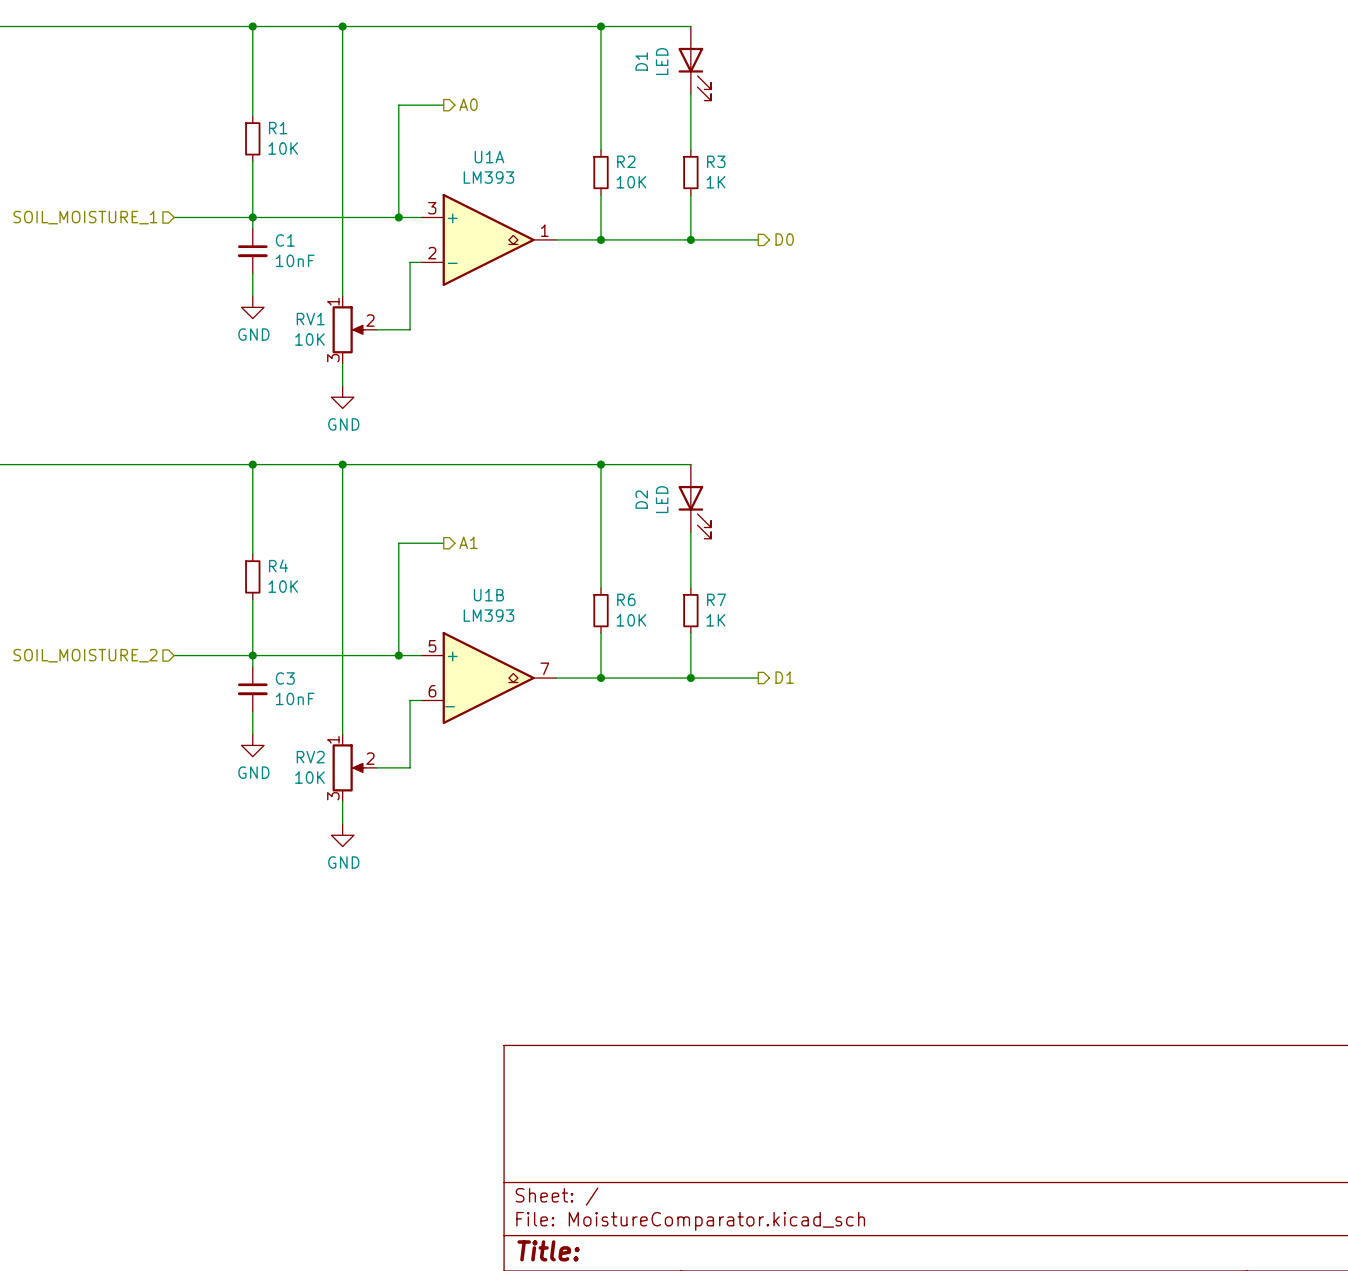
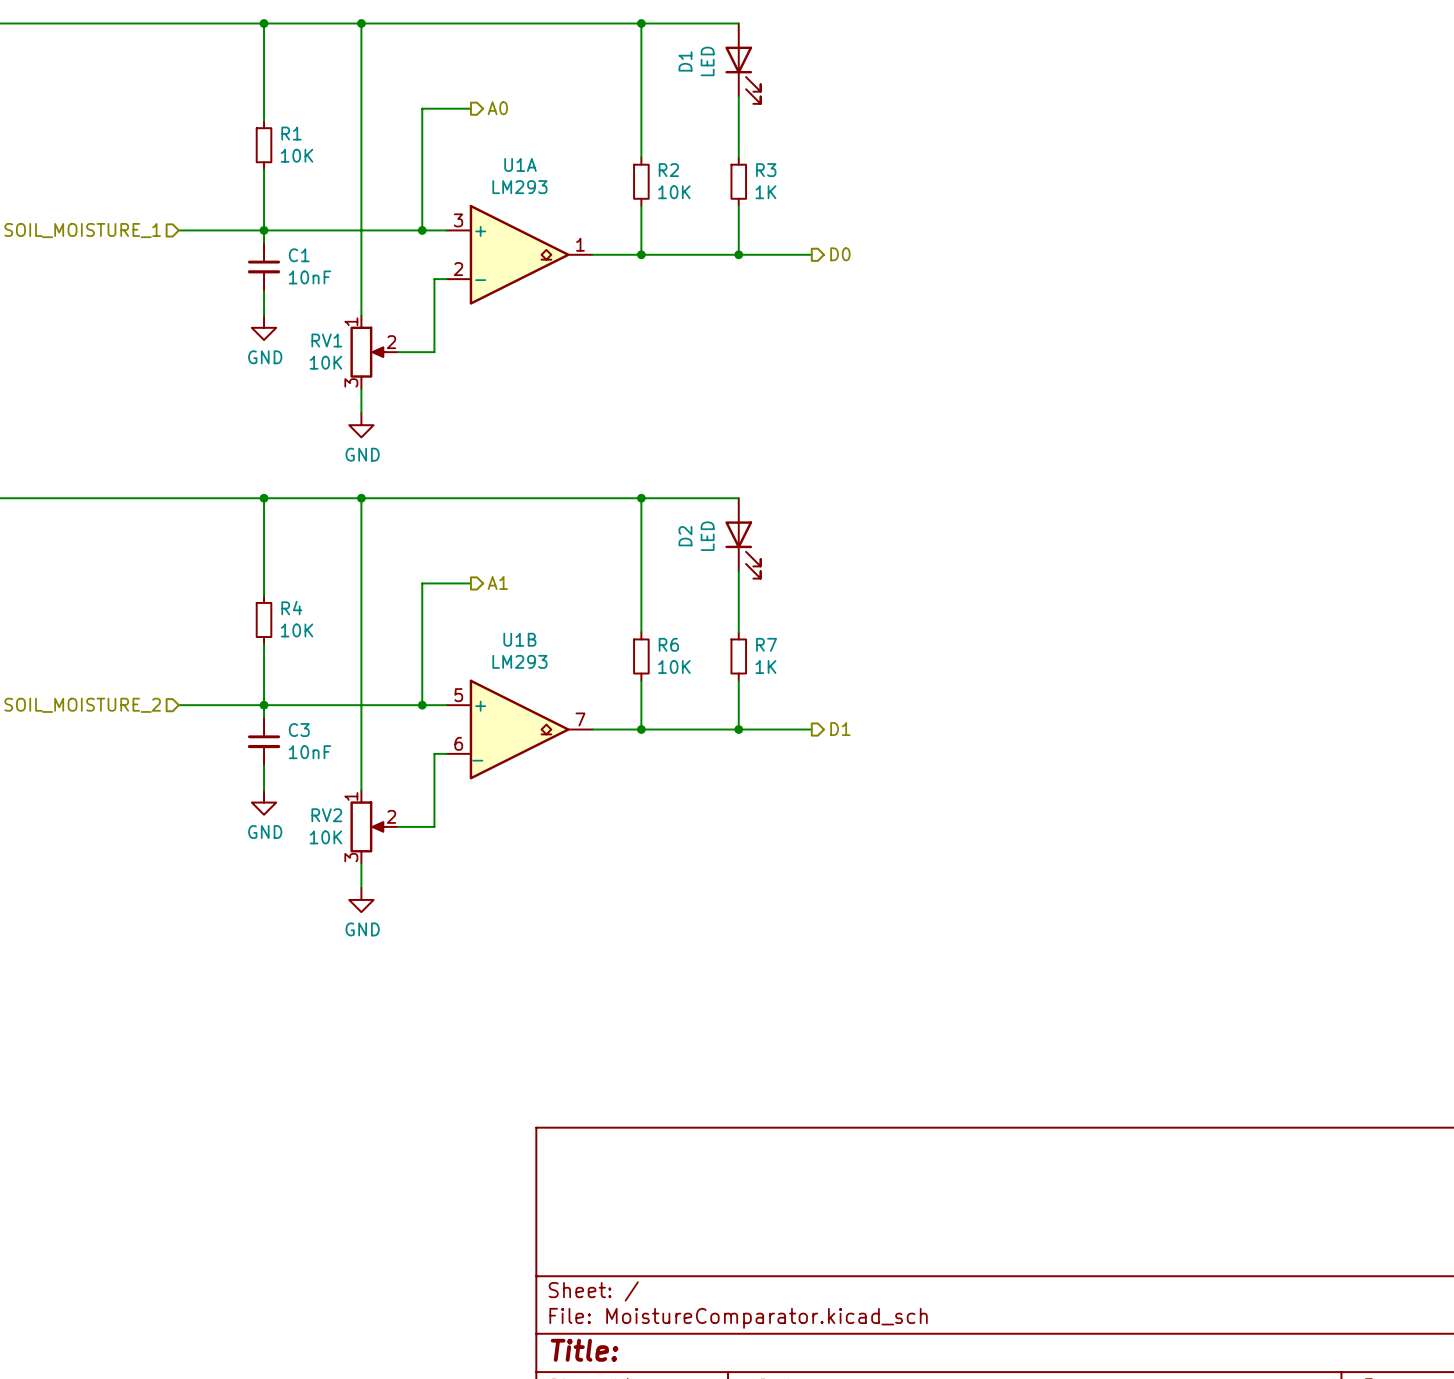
U1A value: LM393 (488, 177) -> LM293 (519, 187)
U1B value: LM393 (488, 615) -> LM293 (519, 661)

